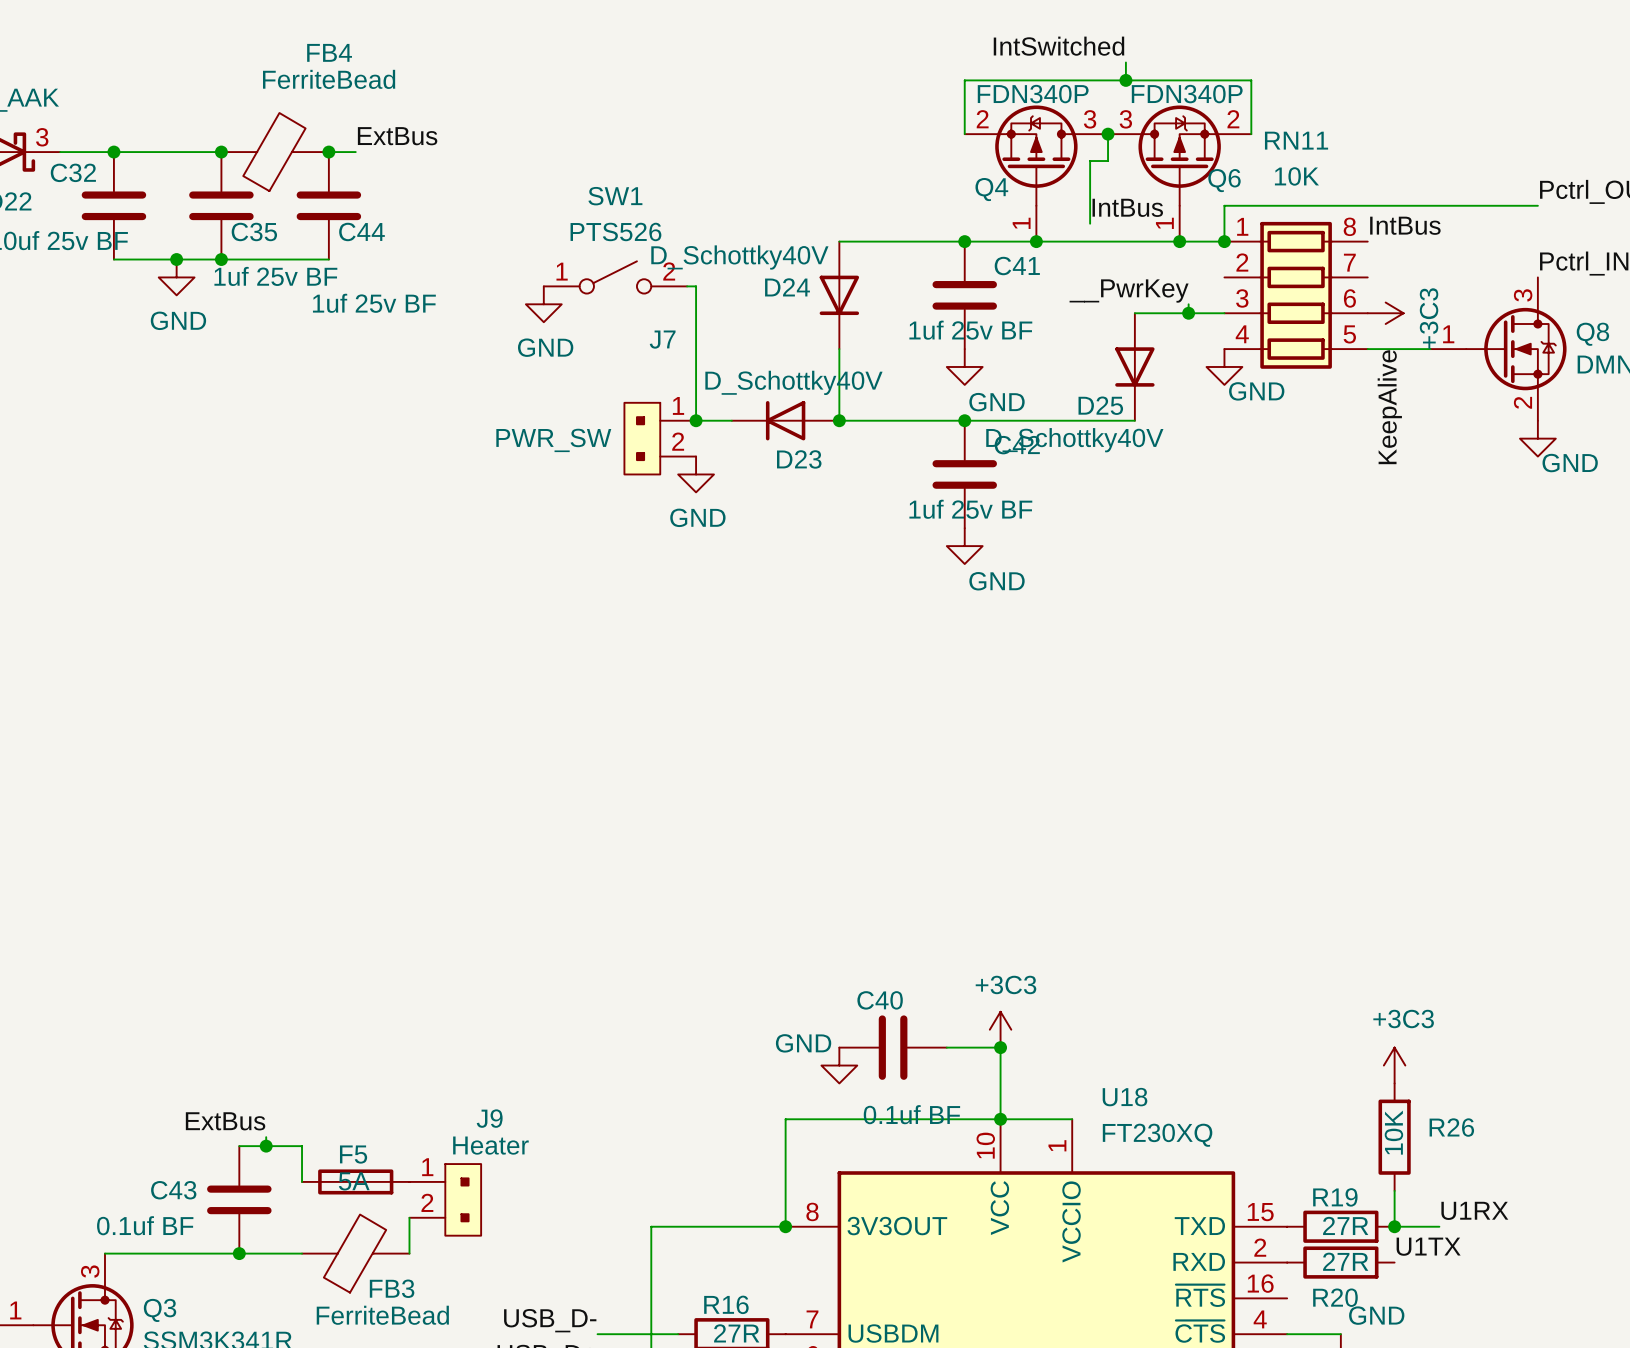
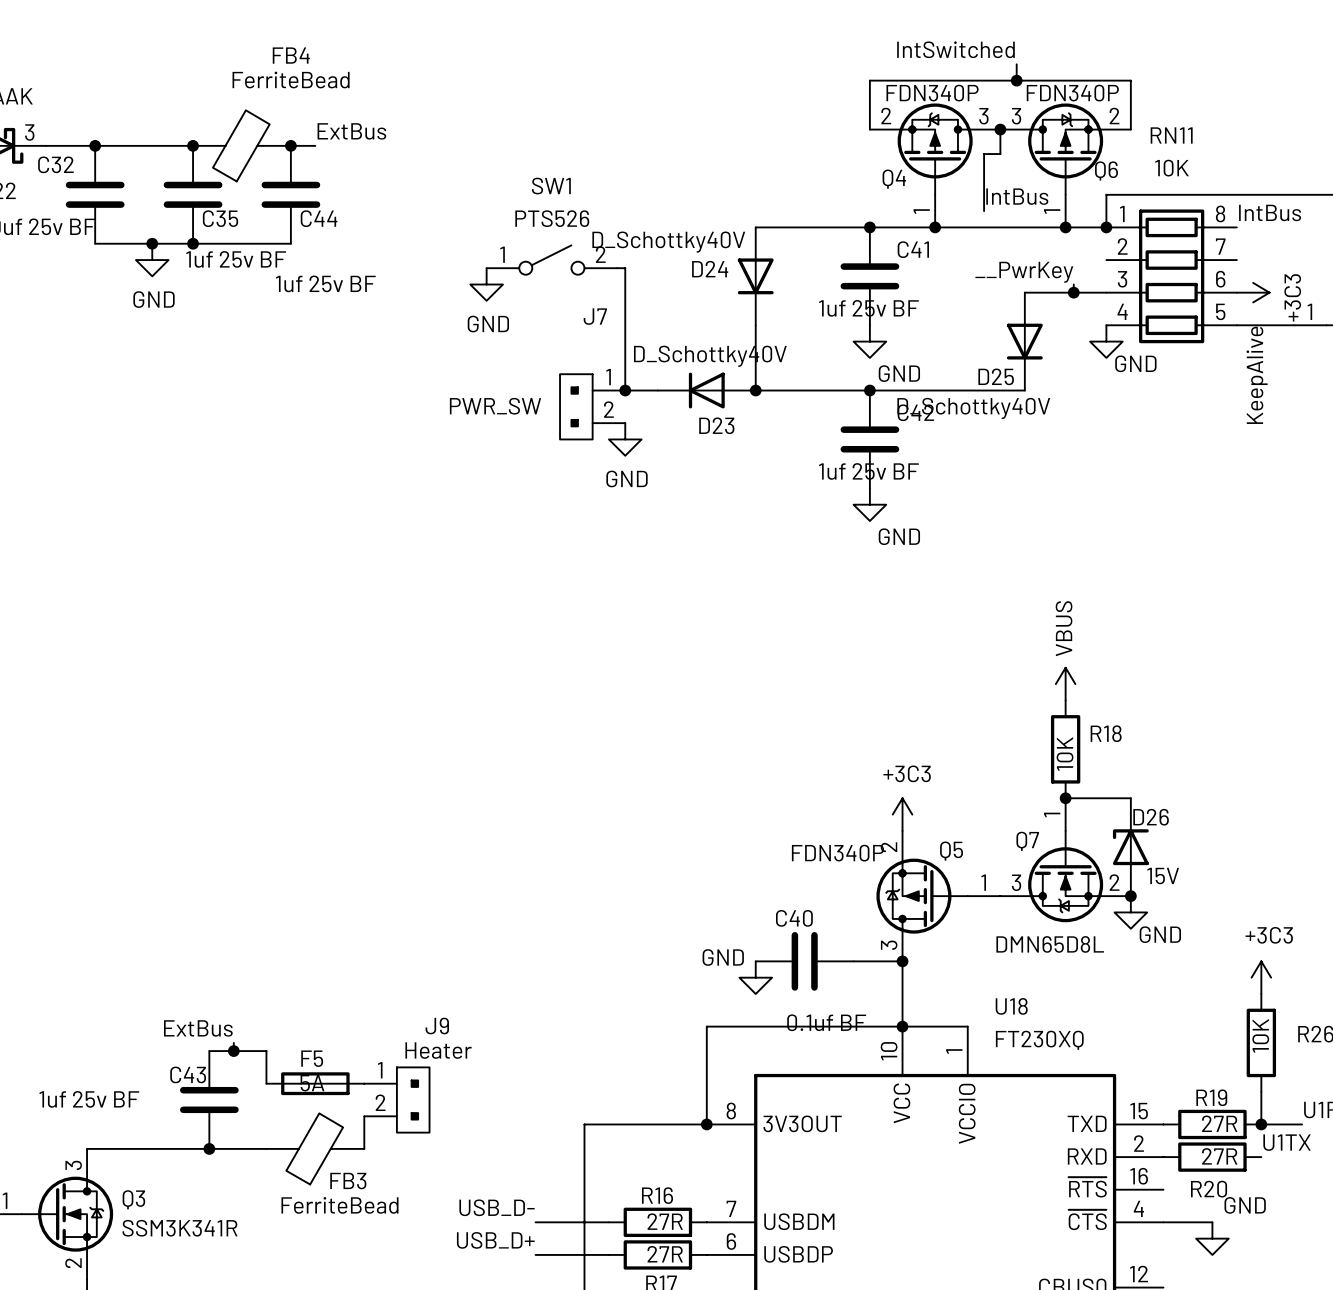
power symbol: none -> VBUS (1065, 684)
R18: none -> 10K (1065, 749)
wire: none -> (1065, 798) (1130, 798)
junction: none -> (1065, 798)
D26: none -> 15V (1130, 847)
Q7: none -> DMN65D8L (1065, 860)
Q5: none -> FDN340P (938, 896)
junction: none -> (1130, 896)
power symbol: none -> GND (1130, 912)
power symbol position: +3C3 (1000, 1029) -> +3C3 (902, 814)
C43 name position: C43 (173, 1190) -> C43 (188, 1074)
C43 value: 0.1uf BF (145, 1225) -> 1uf 25v BF (89, 1099)

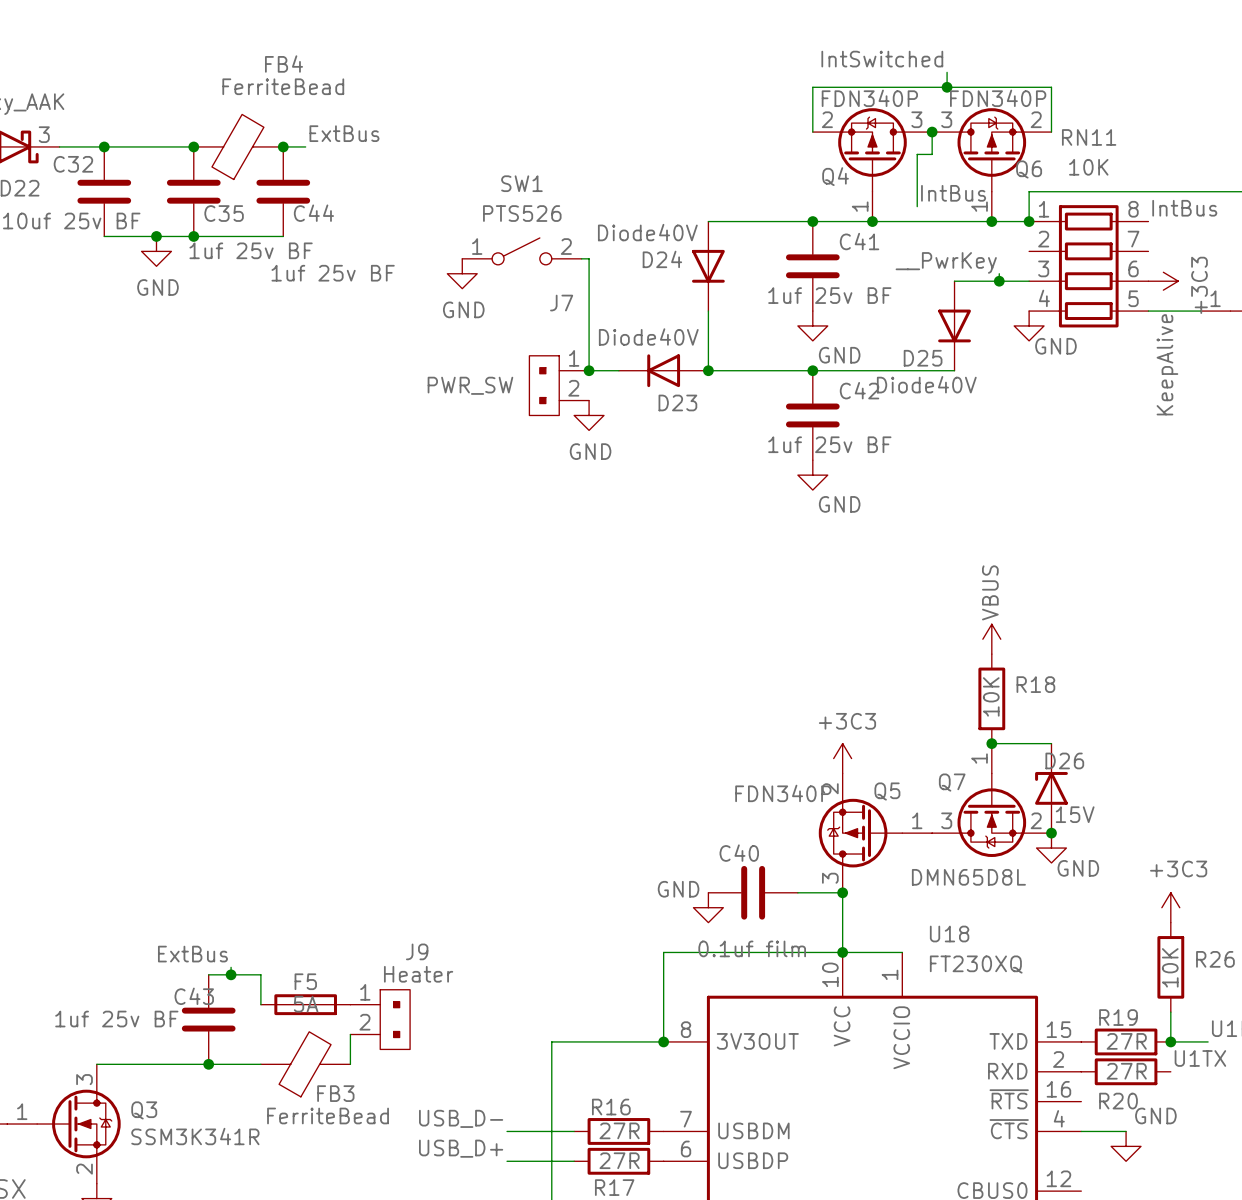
D24 value: D_Schottky40V (668, 242) -> Diode40V (647, 232)
D23 value: D_Schottky40V (710, 356) -> Diode40V (648, 336)
D25 value: D_Schottky40V (973, 408) -> Diode40V (926, 384)
C40 value: 0.1uf BF (826, 1022) -> 0.1uf film (752, 948)

